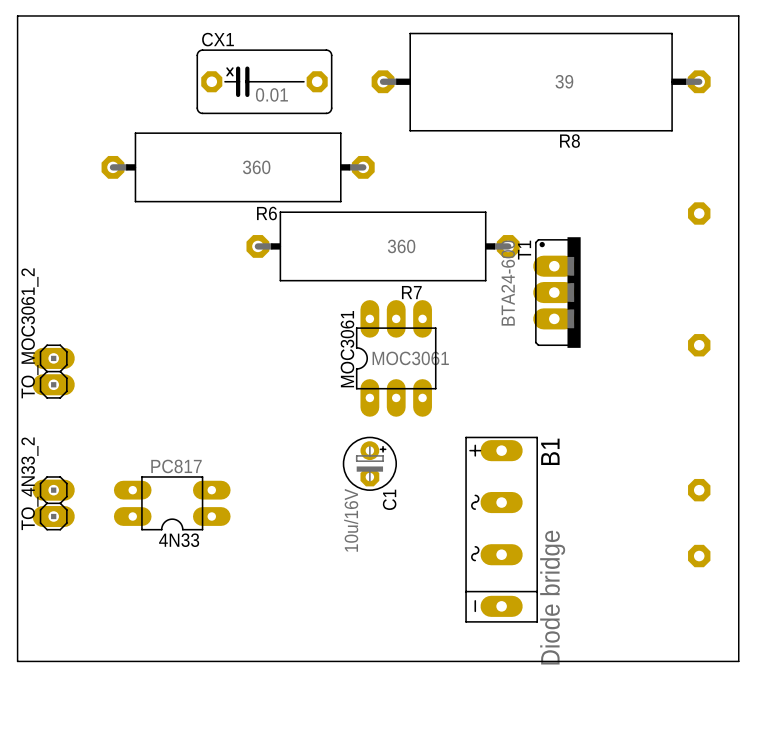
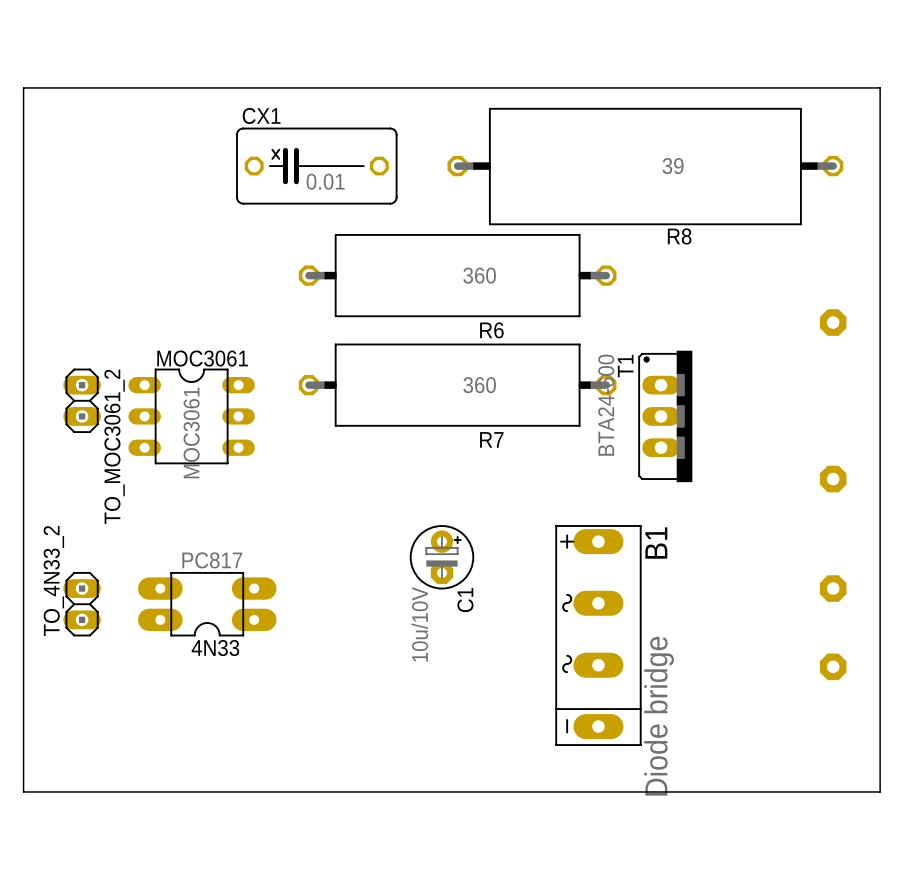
R8 footprint: [371, 32, 711, 132] -> [447, 107, 844, 226]
CX1 footprint: [196, 49, 333, 115] -> [236, 127, 398, 205]
board edge: (738, 68) (738, 15) (17, 15) (17, 68) -> (880, 87) (23, 87)
R6 footprint: [101, 132, 375, 203] -> [298, 234, 617, 318]
R7 footprint: [246, 211, 520, 282] -> [298, 343, 617, 427]
part: (699, 213) -> none
T1 footprint: [533, 237, 581, 348] -> [638, 350, 693, 483]
part: none -> (833, 322)
MOC3061 footprint: [355, 300, 437, 417] -> [128, 368, 255, 465]
TO_MOC3061_2 name position: TO_MOC3061_2 (29, 333) -> TO_MOC3061_2 (114, 446)
TO_MOC3061_2 footprint: [32, 344, 75, 399] -> [63, 368, 101, 434]
part: (699, 345) -> none
MOC3061 name position: MOC3061 (347, 349) -> MOC3061 (202, 358)
MOC3061 value position: MOC3061 (410, 358) -> MOC3061 (191, 433)
part: none -> (833, 479)
TO_4N33_2 footprint: [32, 476, 75, 531] -> [63, 571, 101, 637]
C1 value: 10u/16V (351, 520) -> 10u/10V (419, 624)

